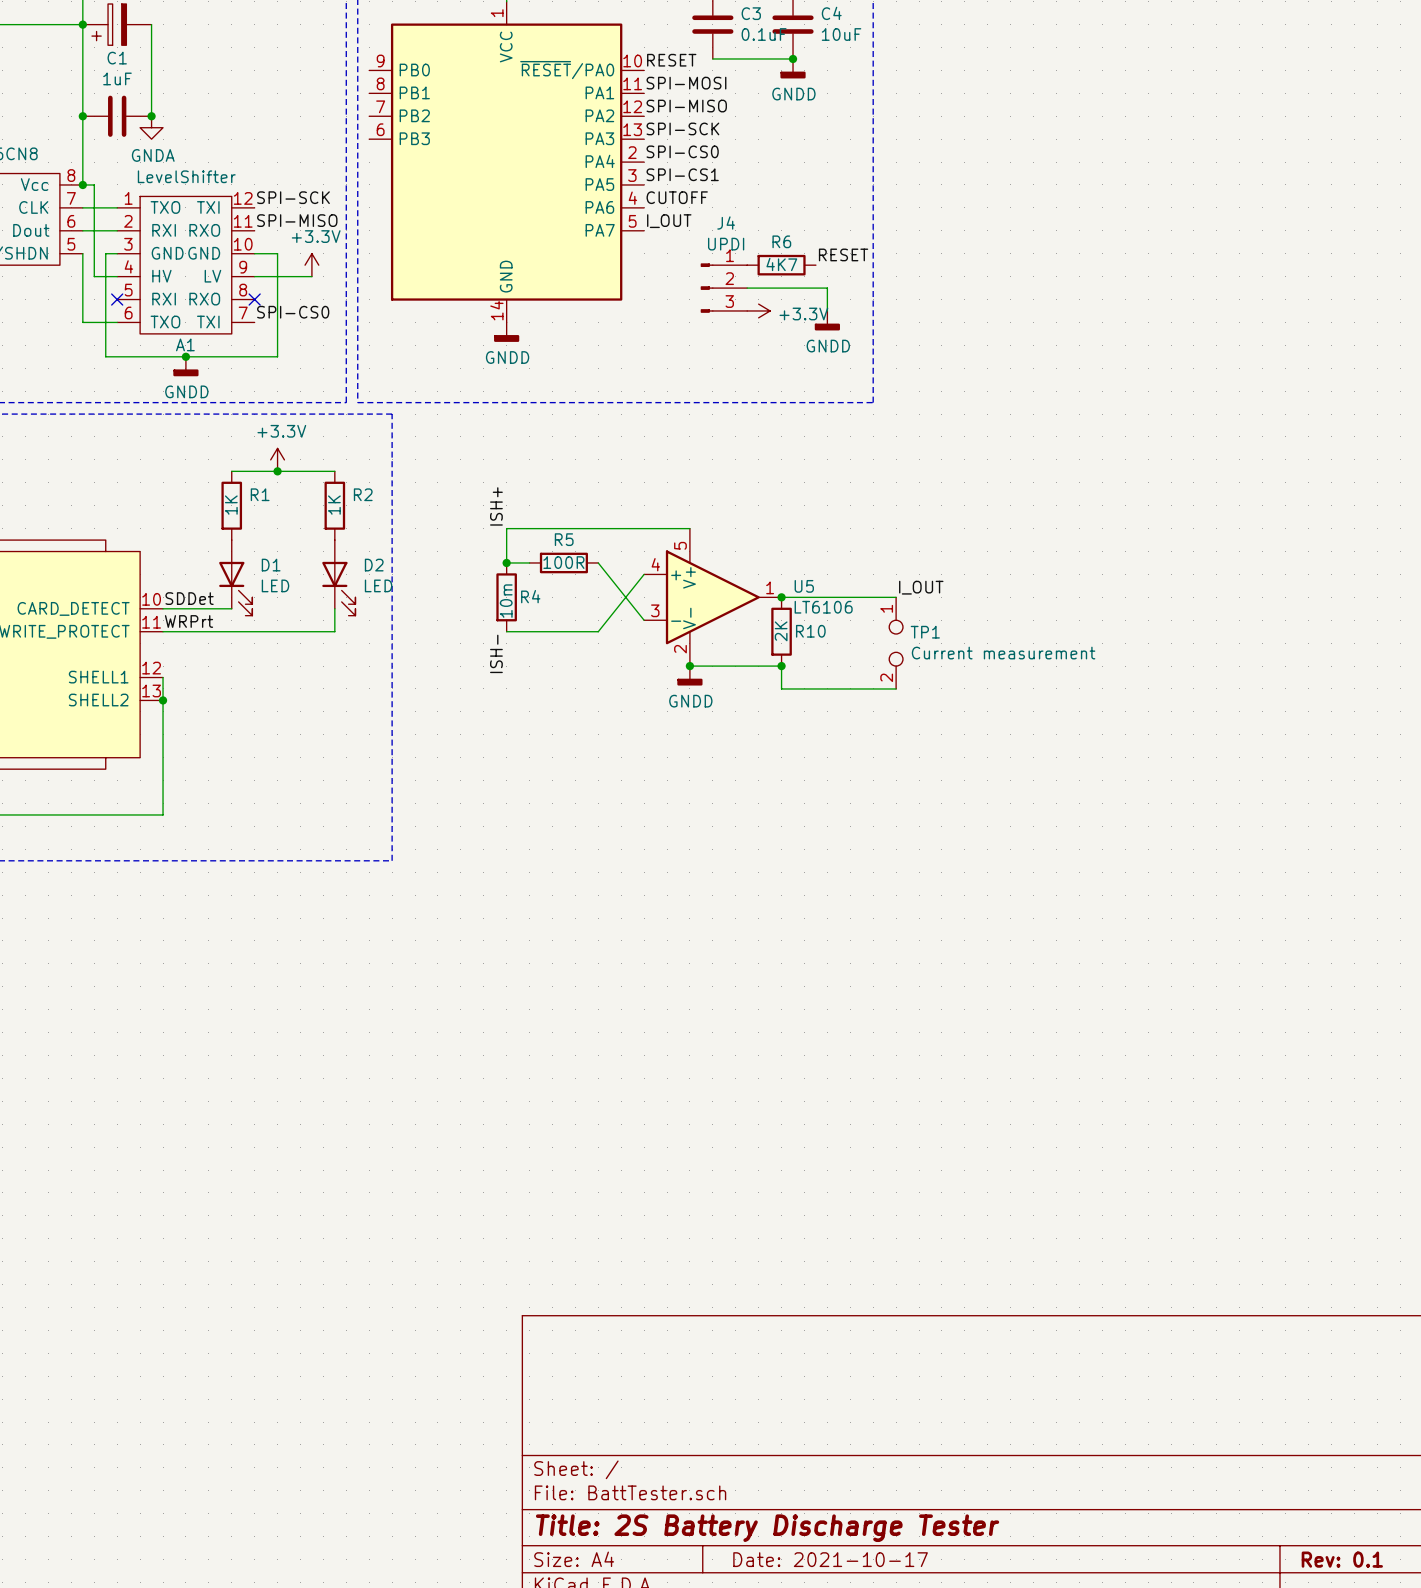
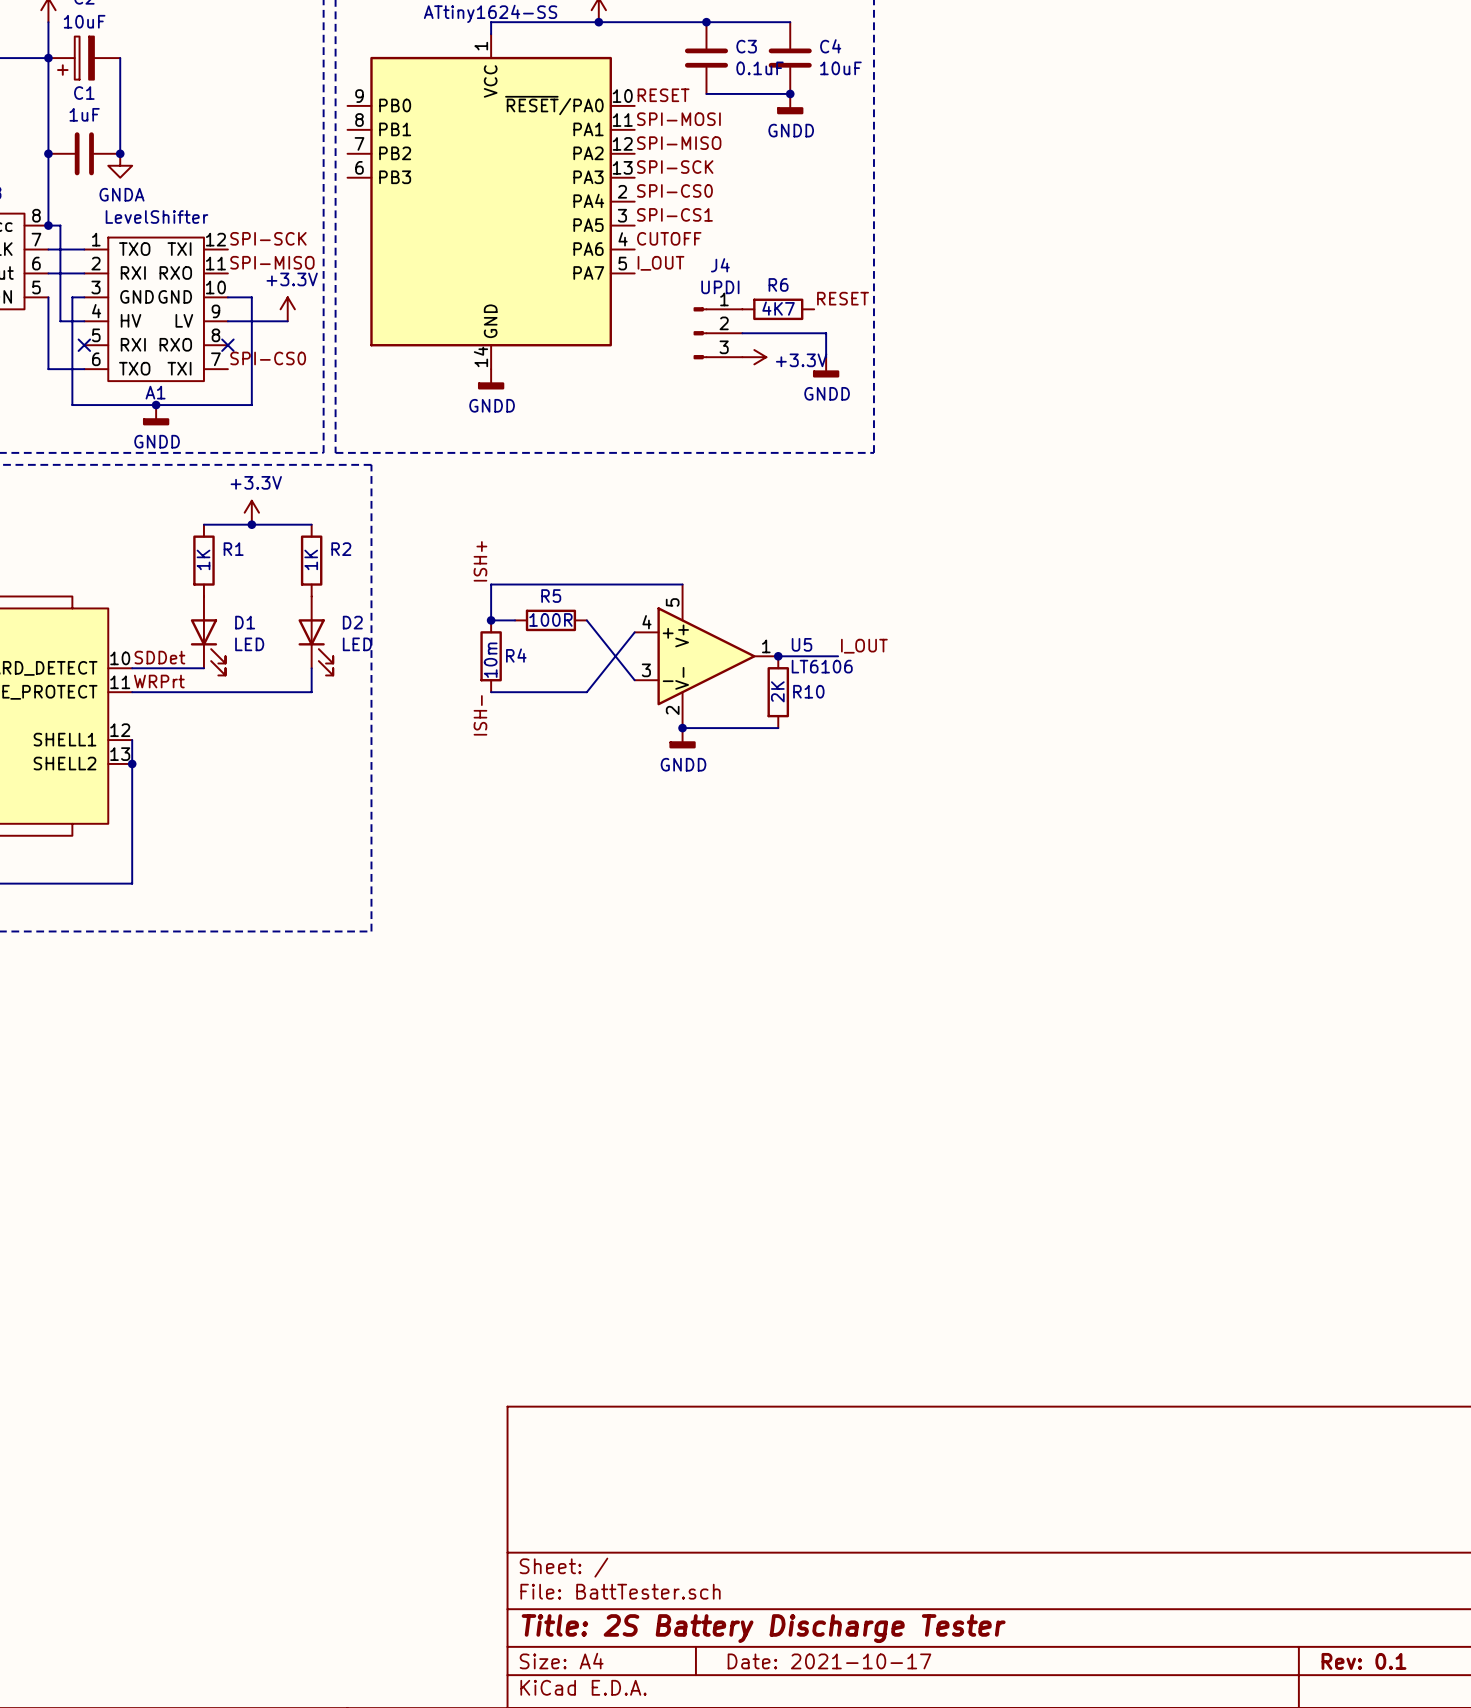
label position: I_OUT (921, 587) -> I_OUT (864, 646)
wire: (838, 597) (896, 597) -> none
TP1: Current measurement (896, 643) -> none
wire: (781, 666) (781, 688) (896, 688) -> none
junction: (781, 666) -> none

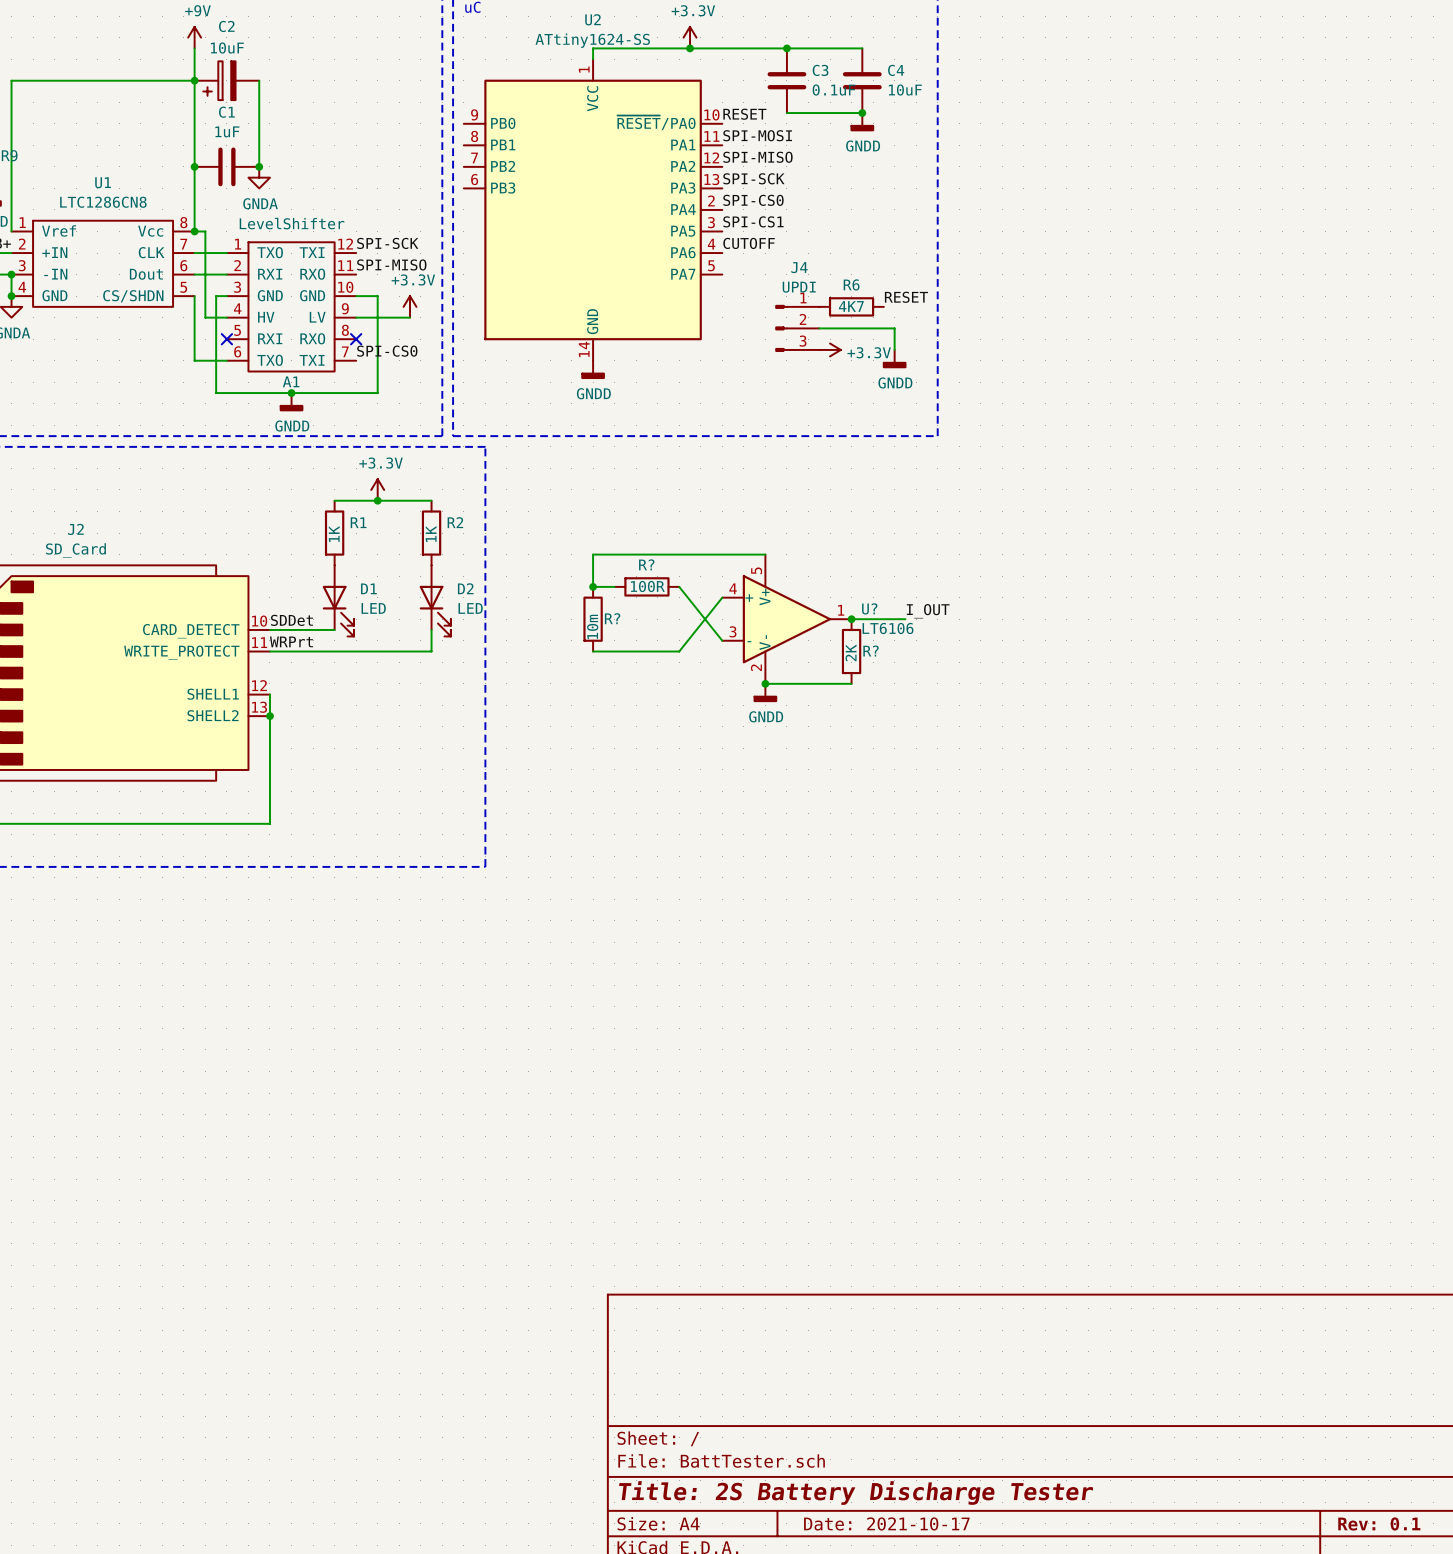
label: I_OUT (660, 263) -> none
label: ISH+ (480, 561) -> none
R5 name: R5 (551, 596) -> R? (646, 564)
U5 name: U5 (801, 644) -> U? (869, 608)
R4 name: R4 (516, 655) -> R? (612, 618)
R10 name: R10 (808, 691) -> R? (871, 651)
label: ISH- (480, 715) -> none

